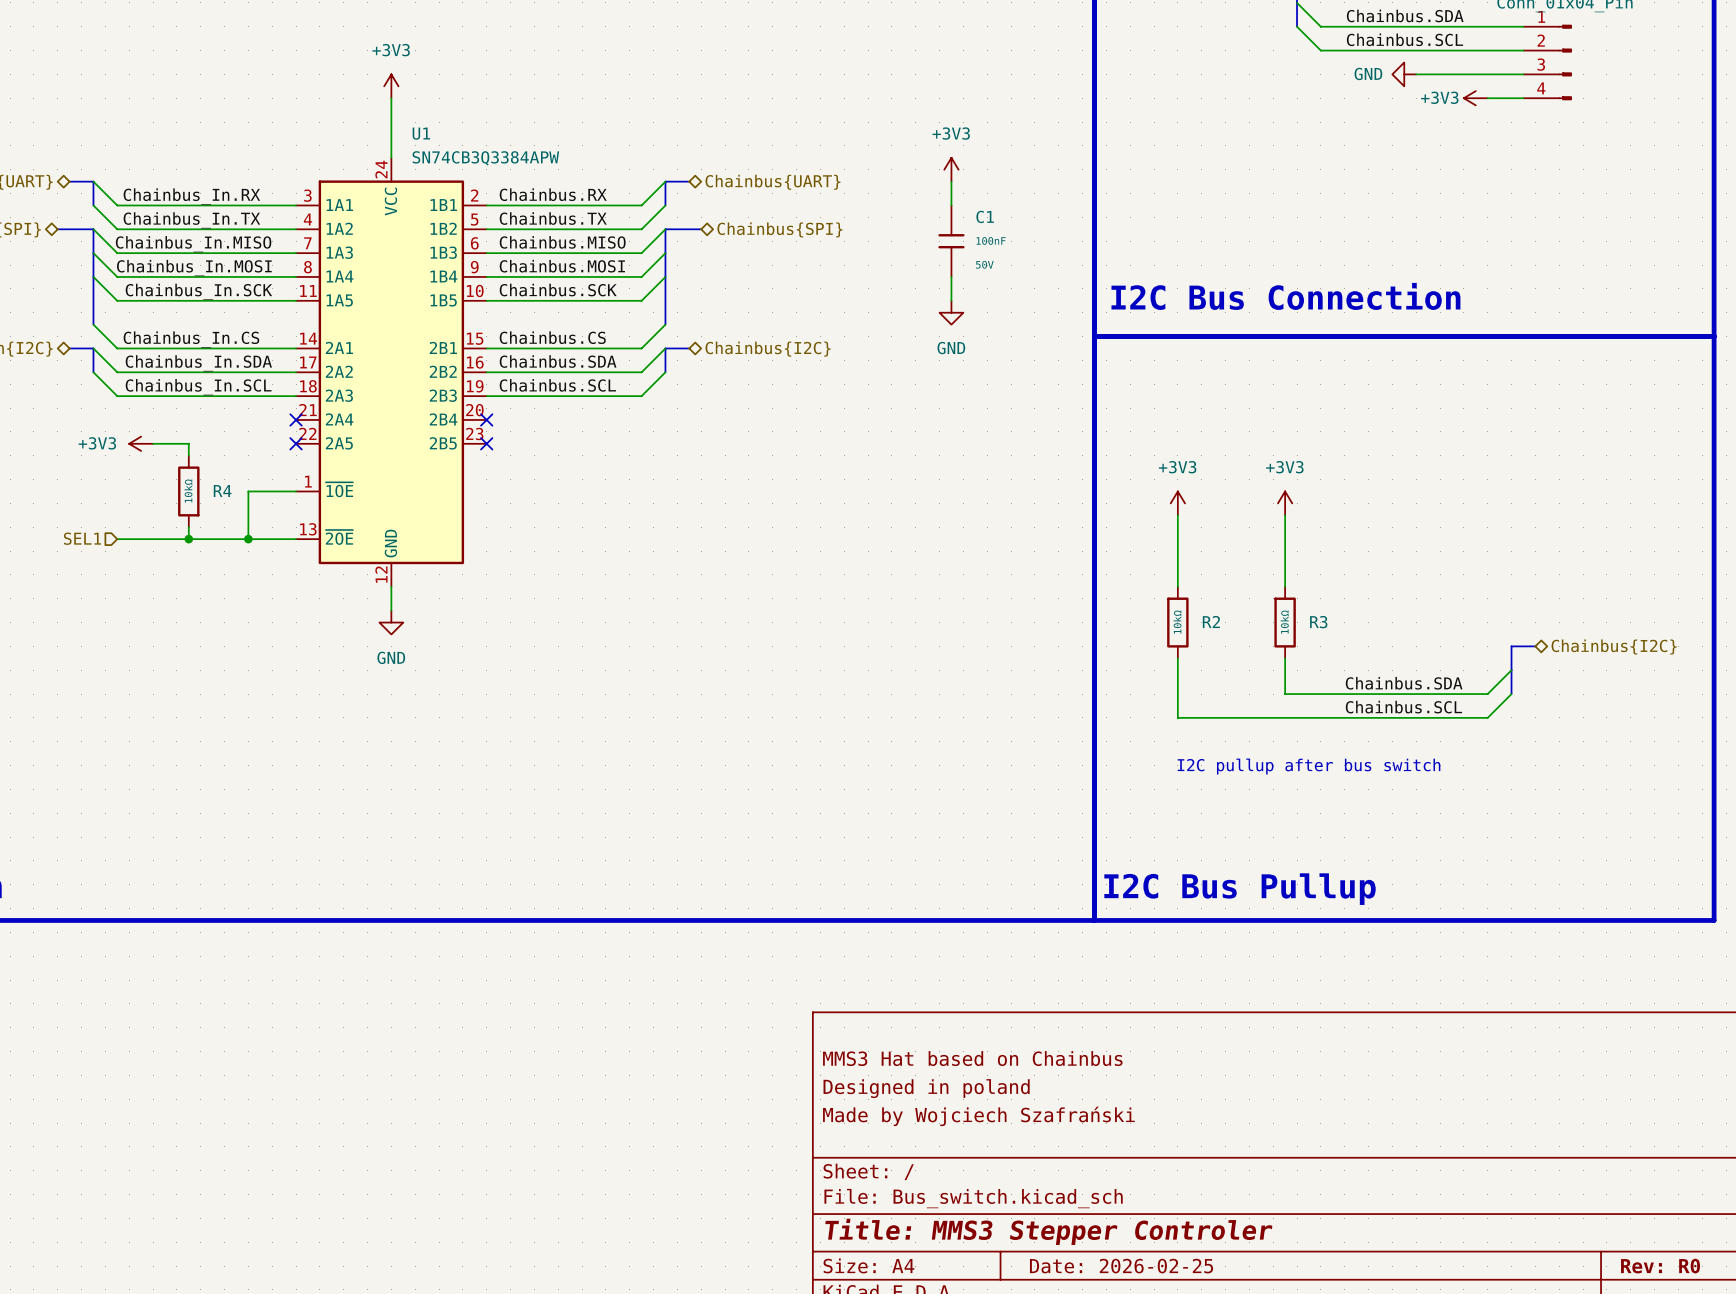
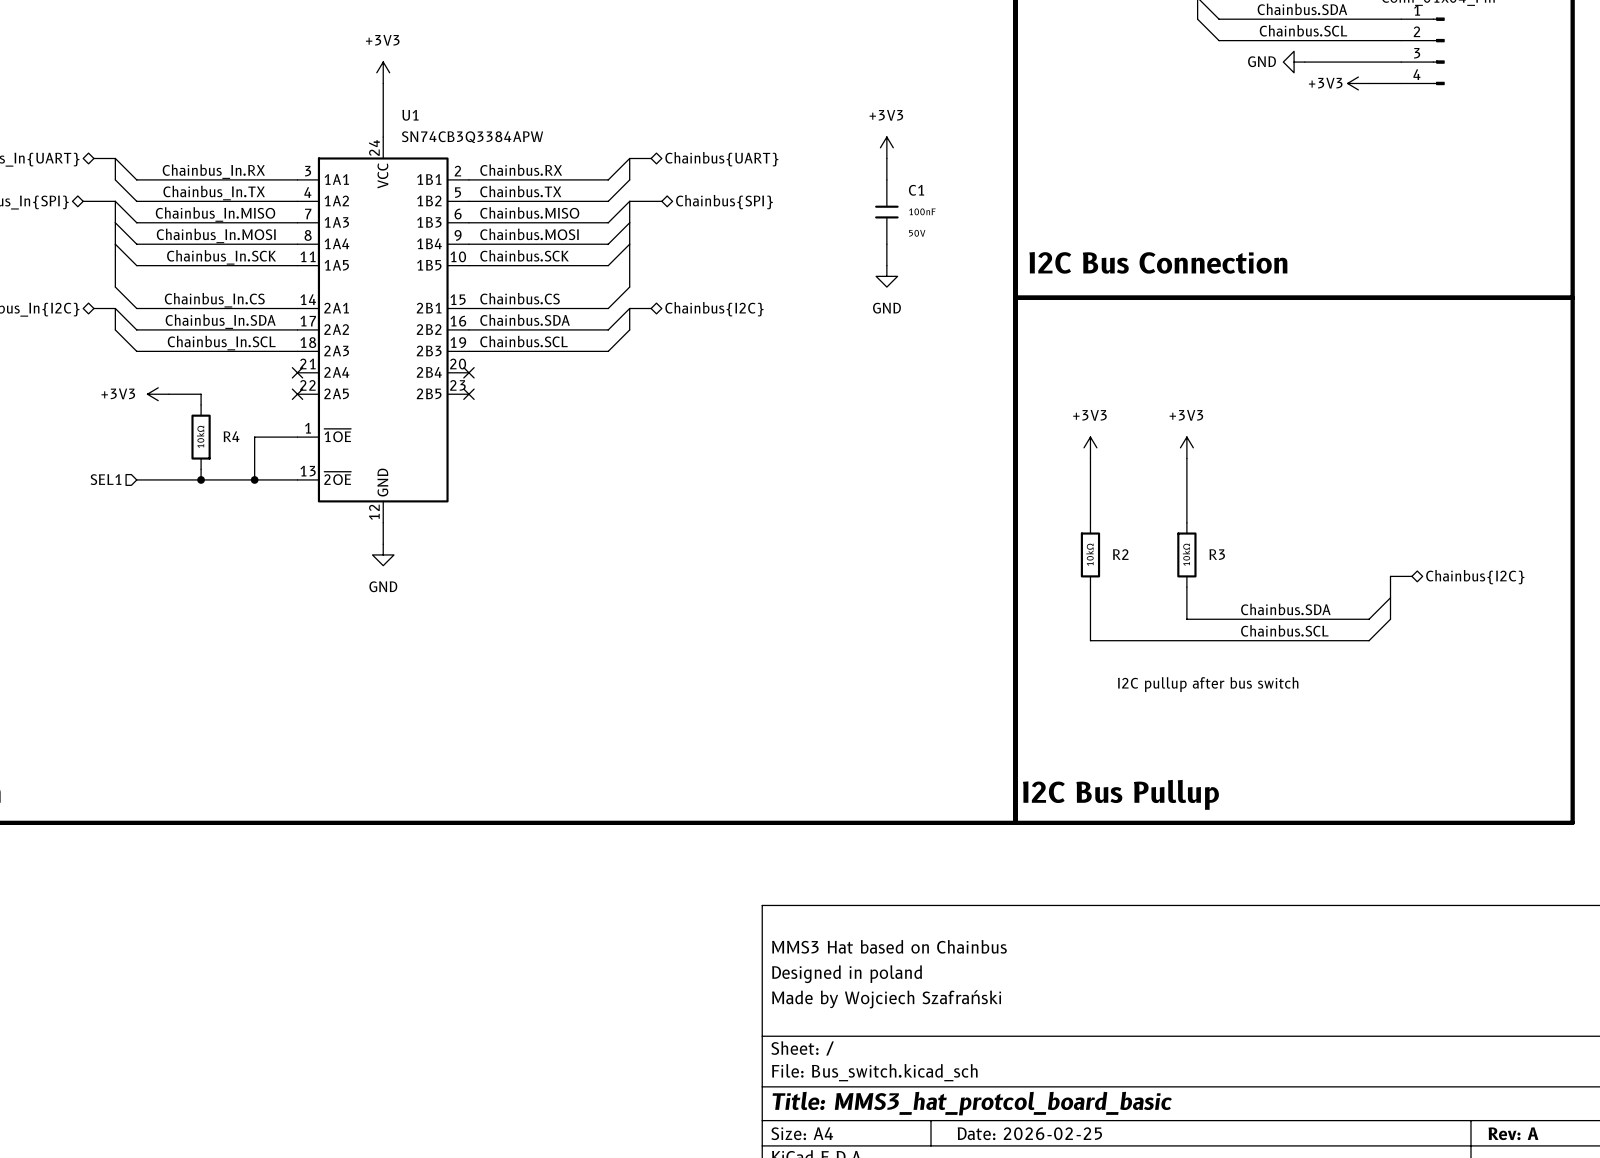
title block: Title: MMS3 Stepper Controler (1048, 1231) -> Title: MMS3_hat_protcol_board_basic (972, 1103)
title block: Rev: R0 (1660, 1266) -> Rev: A (1513, 1133)

